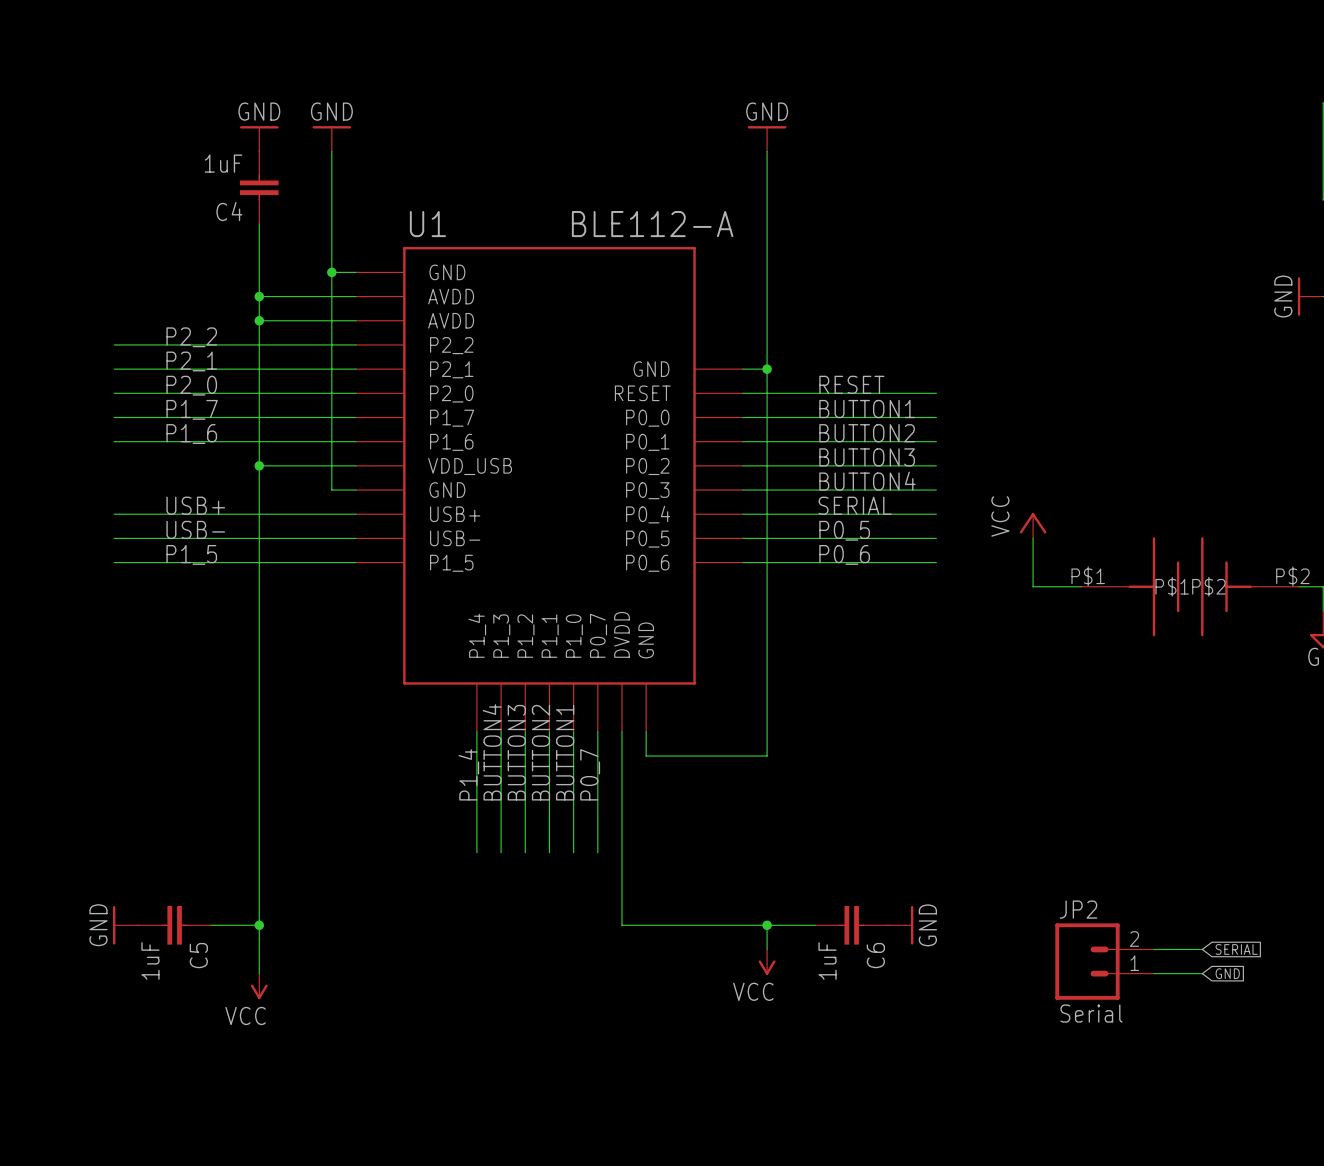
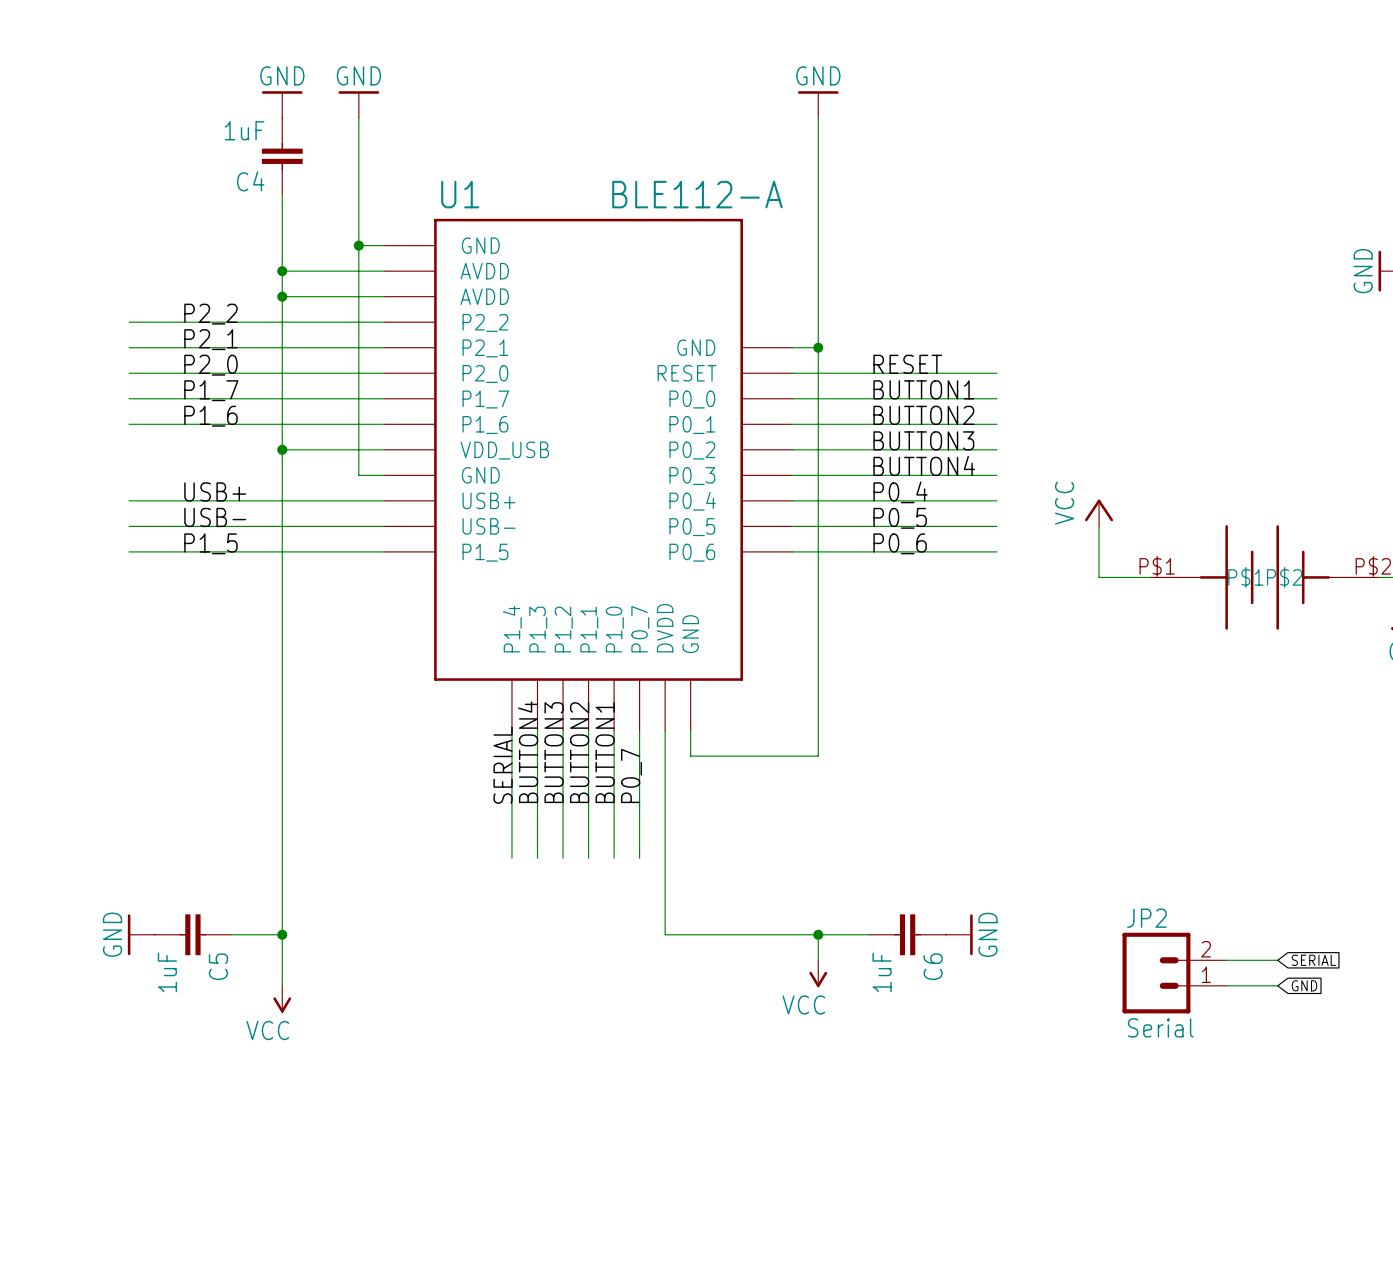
label: SERIAL (855, 505) -> P0_4 (900, 492)
label: P1_4 (468, 774) -> SERIAL (503, 765)

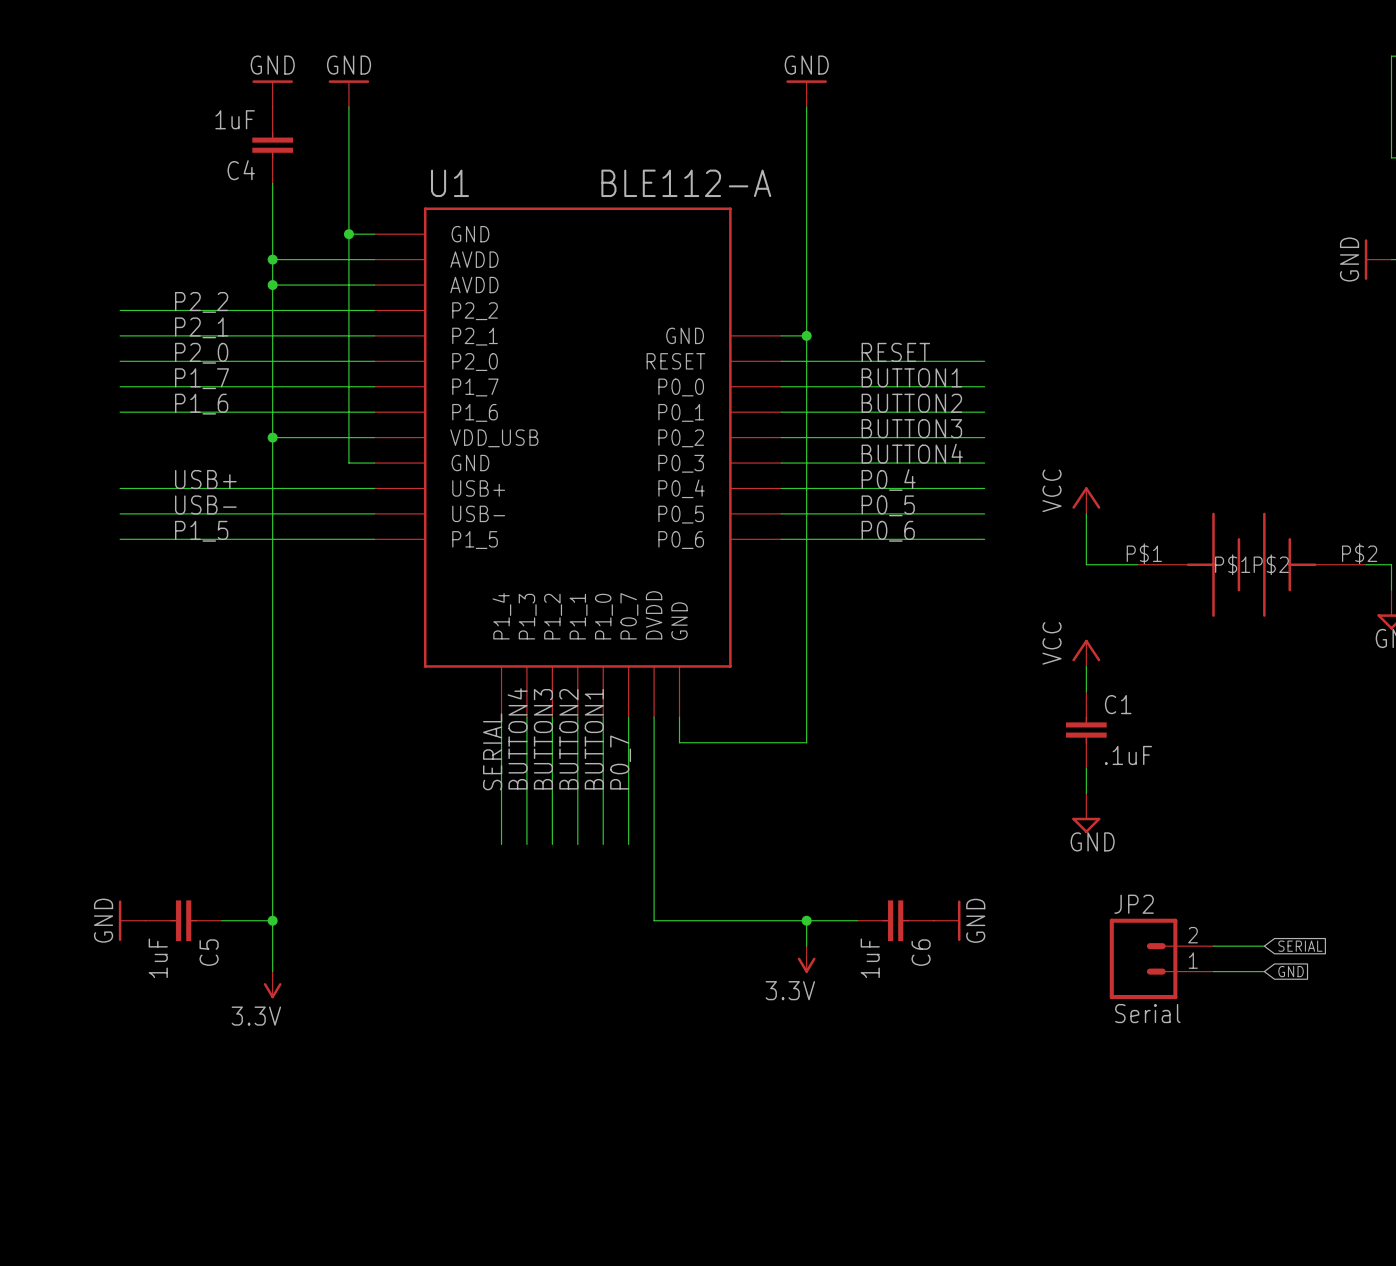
power symbol: none -> VCC (1086, 653)
wire: none -> (1086, 666) (1086, 691)
C1: none -> .1uF (1086, 730)
wire: none -> (1086, 768) (1086, 793)
power symbol: none -> GND (1086, 813)
power symbol: VCC (818, 973) -> 3.3V (806, 959)
power symbol: VCC (282, 999) -> 3.3V (272, 984)

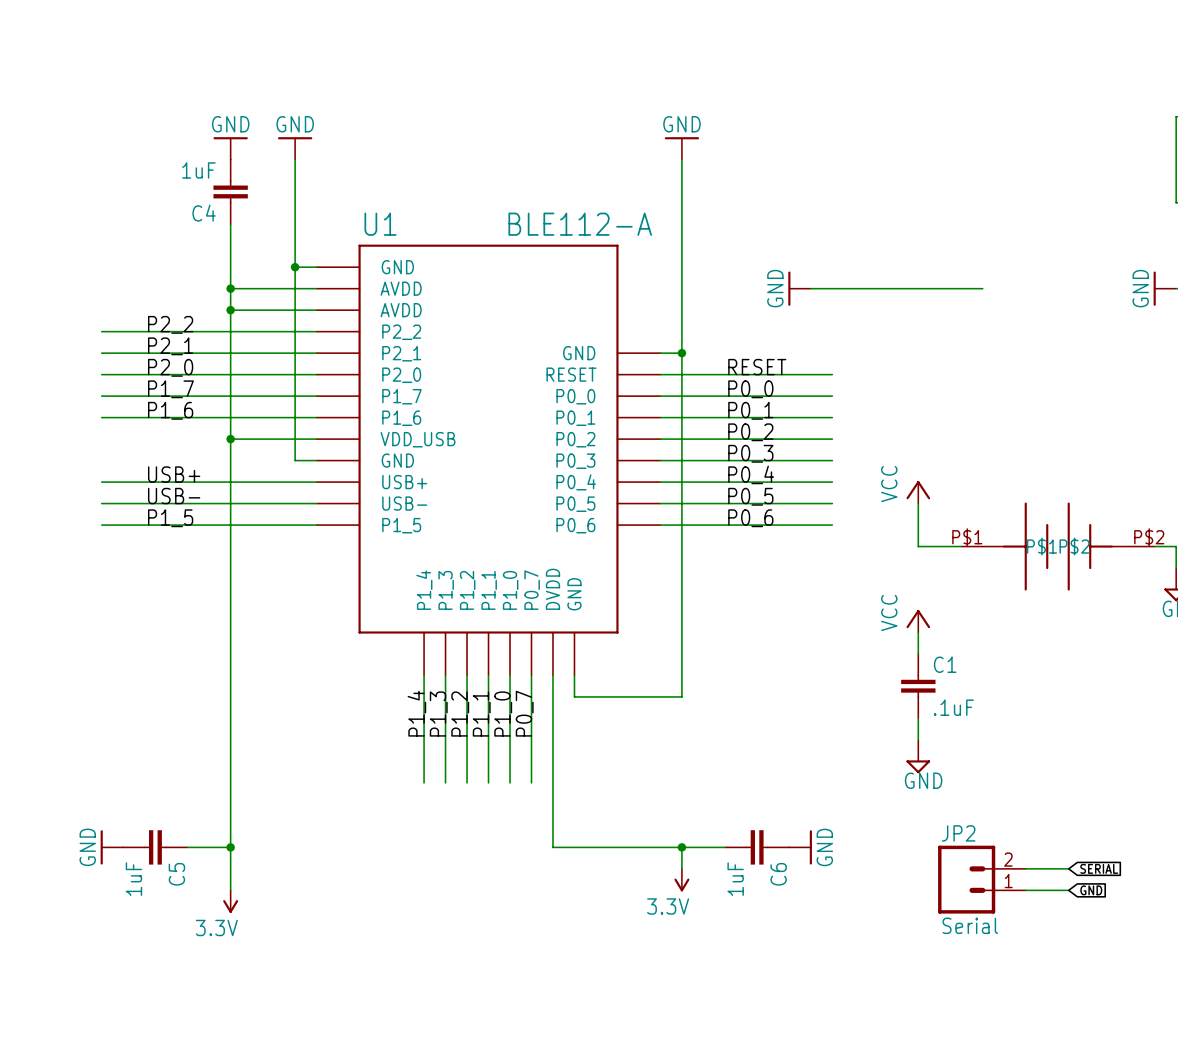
power symbol: none -> GND (799, 288)
wire: none -> (810, 288) (982, 288)
label: BUTTON1 (911, 377) -> P0_0 (750, 389)
label: BUTTON2 (911, 403) -> P0_1 (750, 410)
label: BUTTON3 (911, 428) -> P0_2 (750, 432)
label: BUTTON4 (912, 453) -> P0_3 (750, 453)
label: BUTTON4 (517, 738) -> P1_3 (438, 714)
label: BUTTON3 (543, 739) -> P1_2 (460, 714)
label: BUTTON2 (568, 739) -> P1_1 (481, 714)
label: BUTTON1 (594, 739) -> P1_0 (503, 714)
label: SERIAL (492, 751) -> P1_4 (416, 713)

